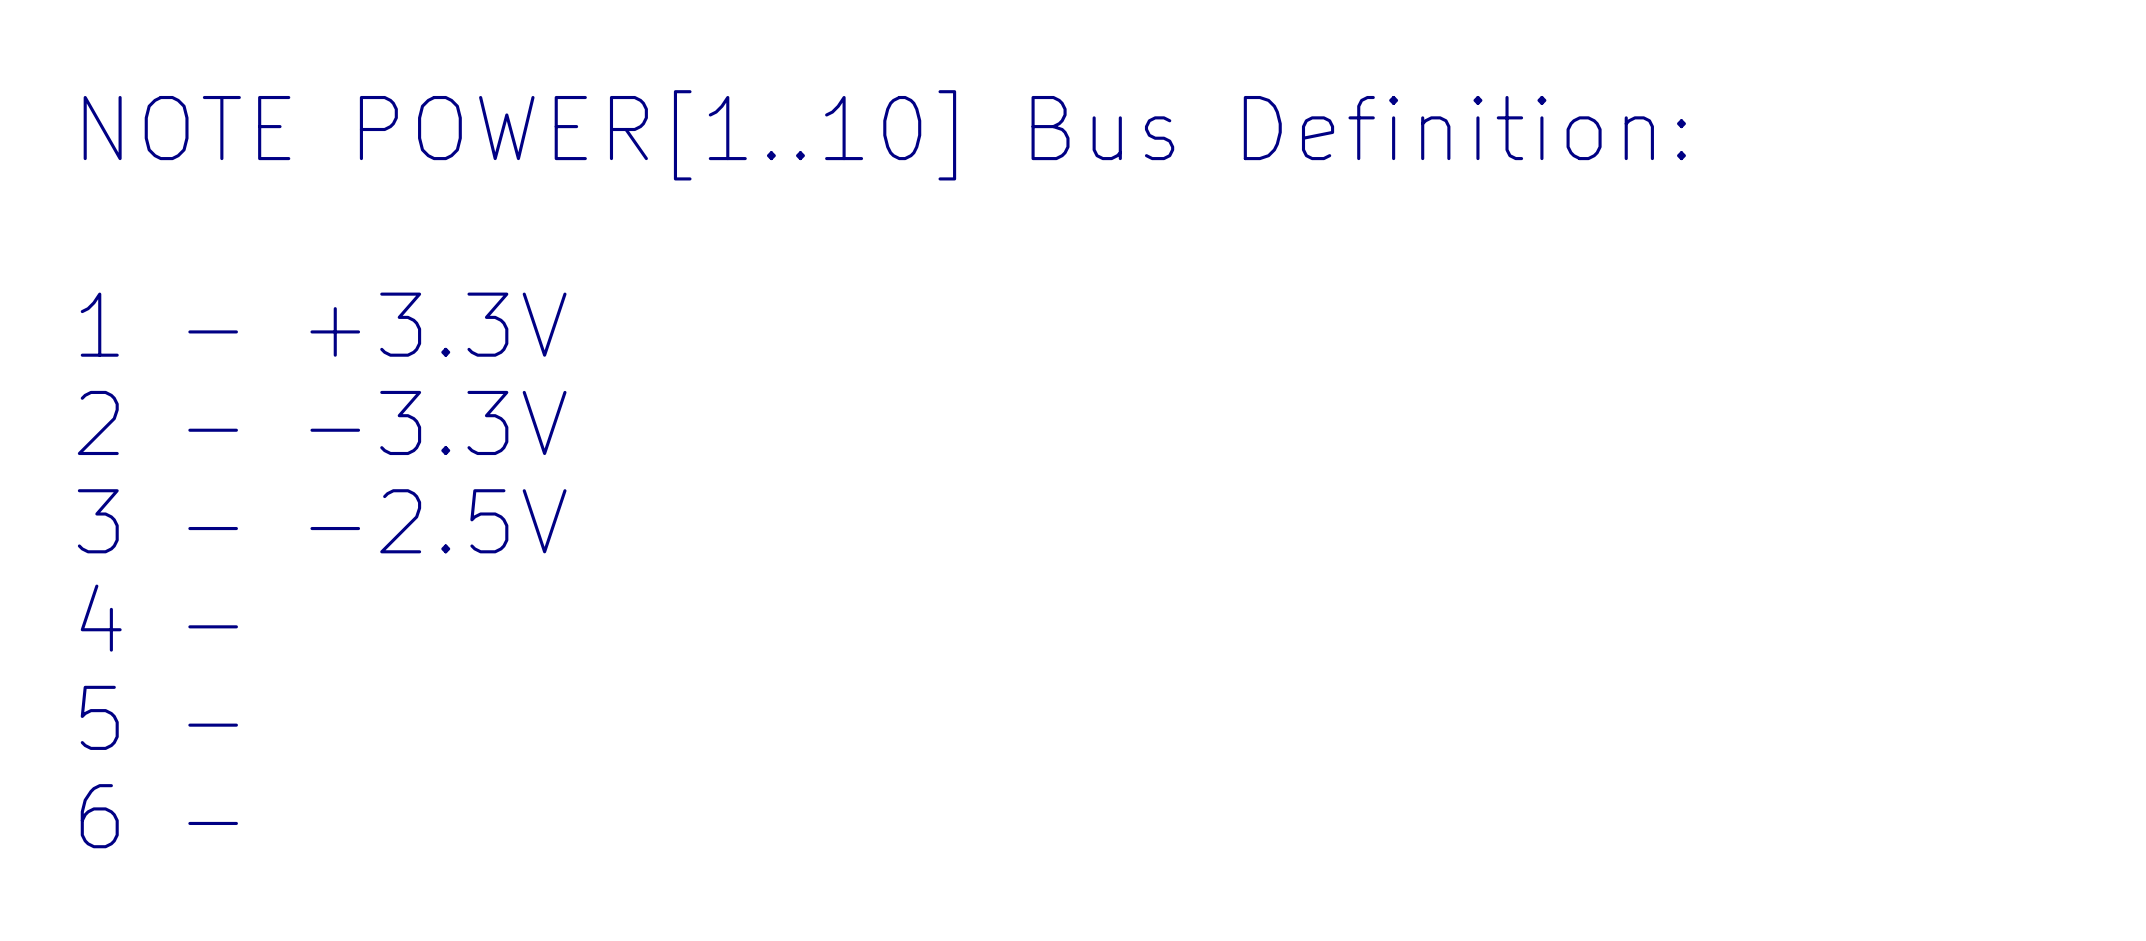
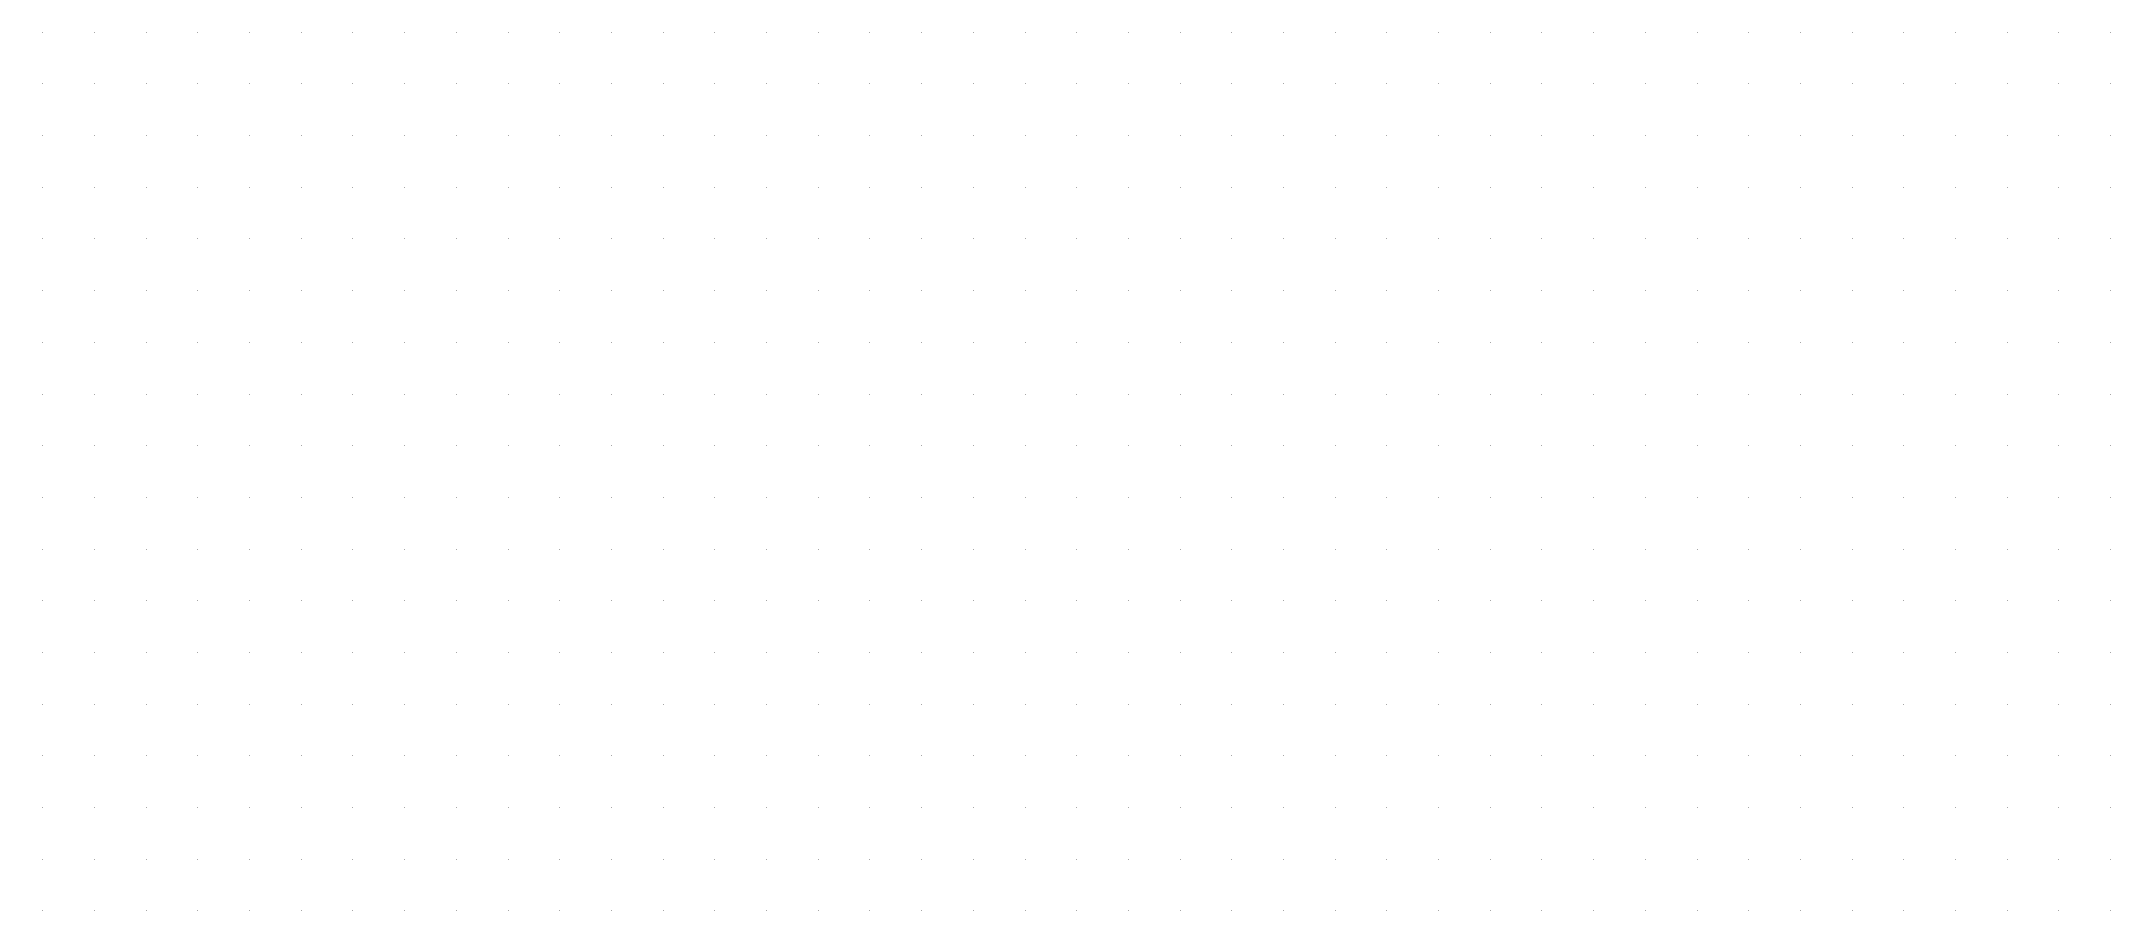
text: NOTE POWER[1..10] Bus Definition: (884, 135) -> none
text: 1 - +3.3V (323, 324) -> none
text: 2 - -3.3V (322, 422) -> none
text: 3 - -2.5V (322, 521) -> none
text: 4 - (159, 618) -> none
text: 5 - (159, 717) -> none
text: 6 - (159, 816) -> none

